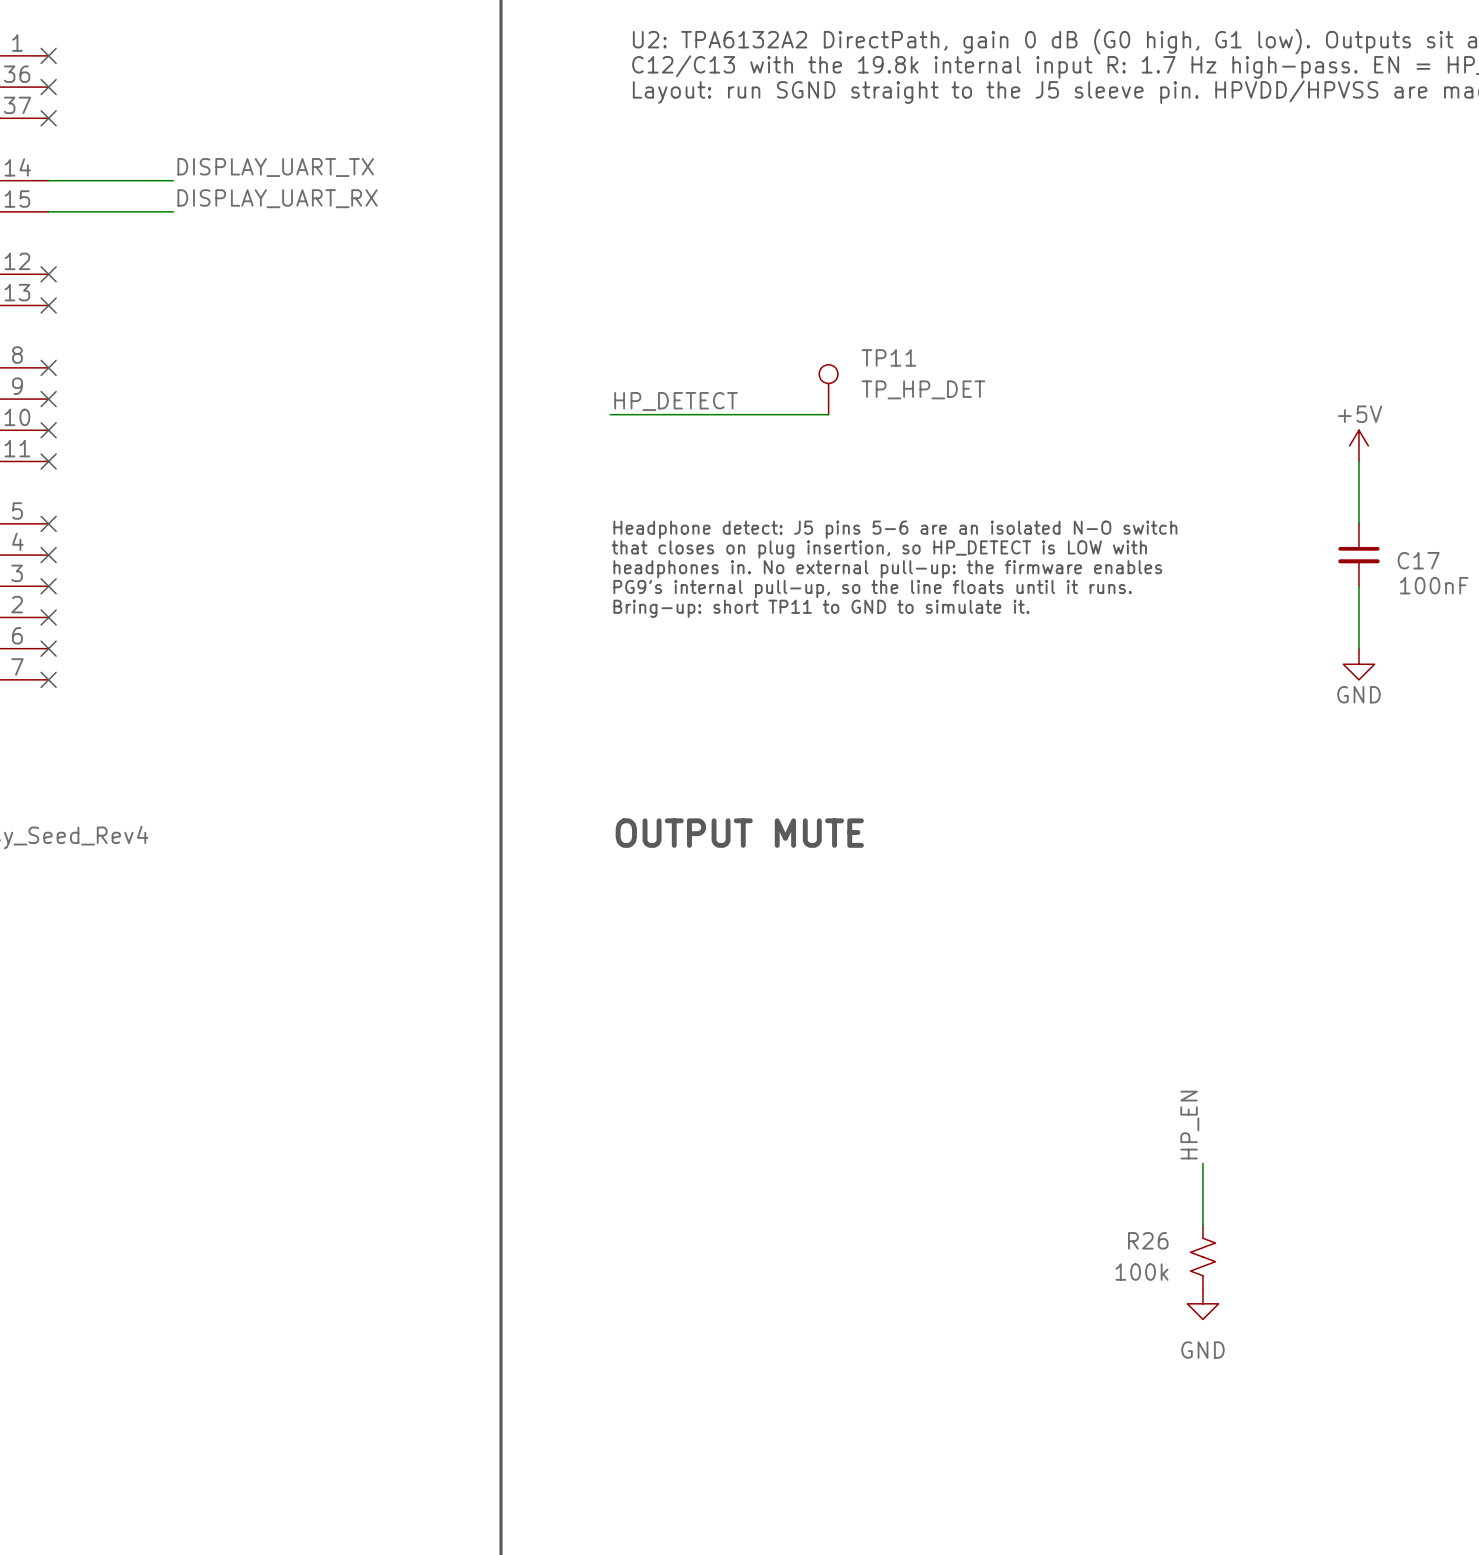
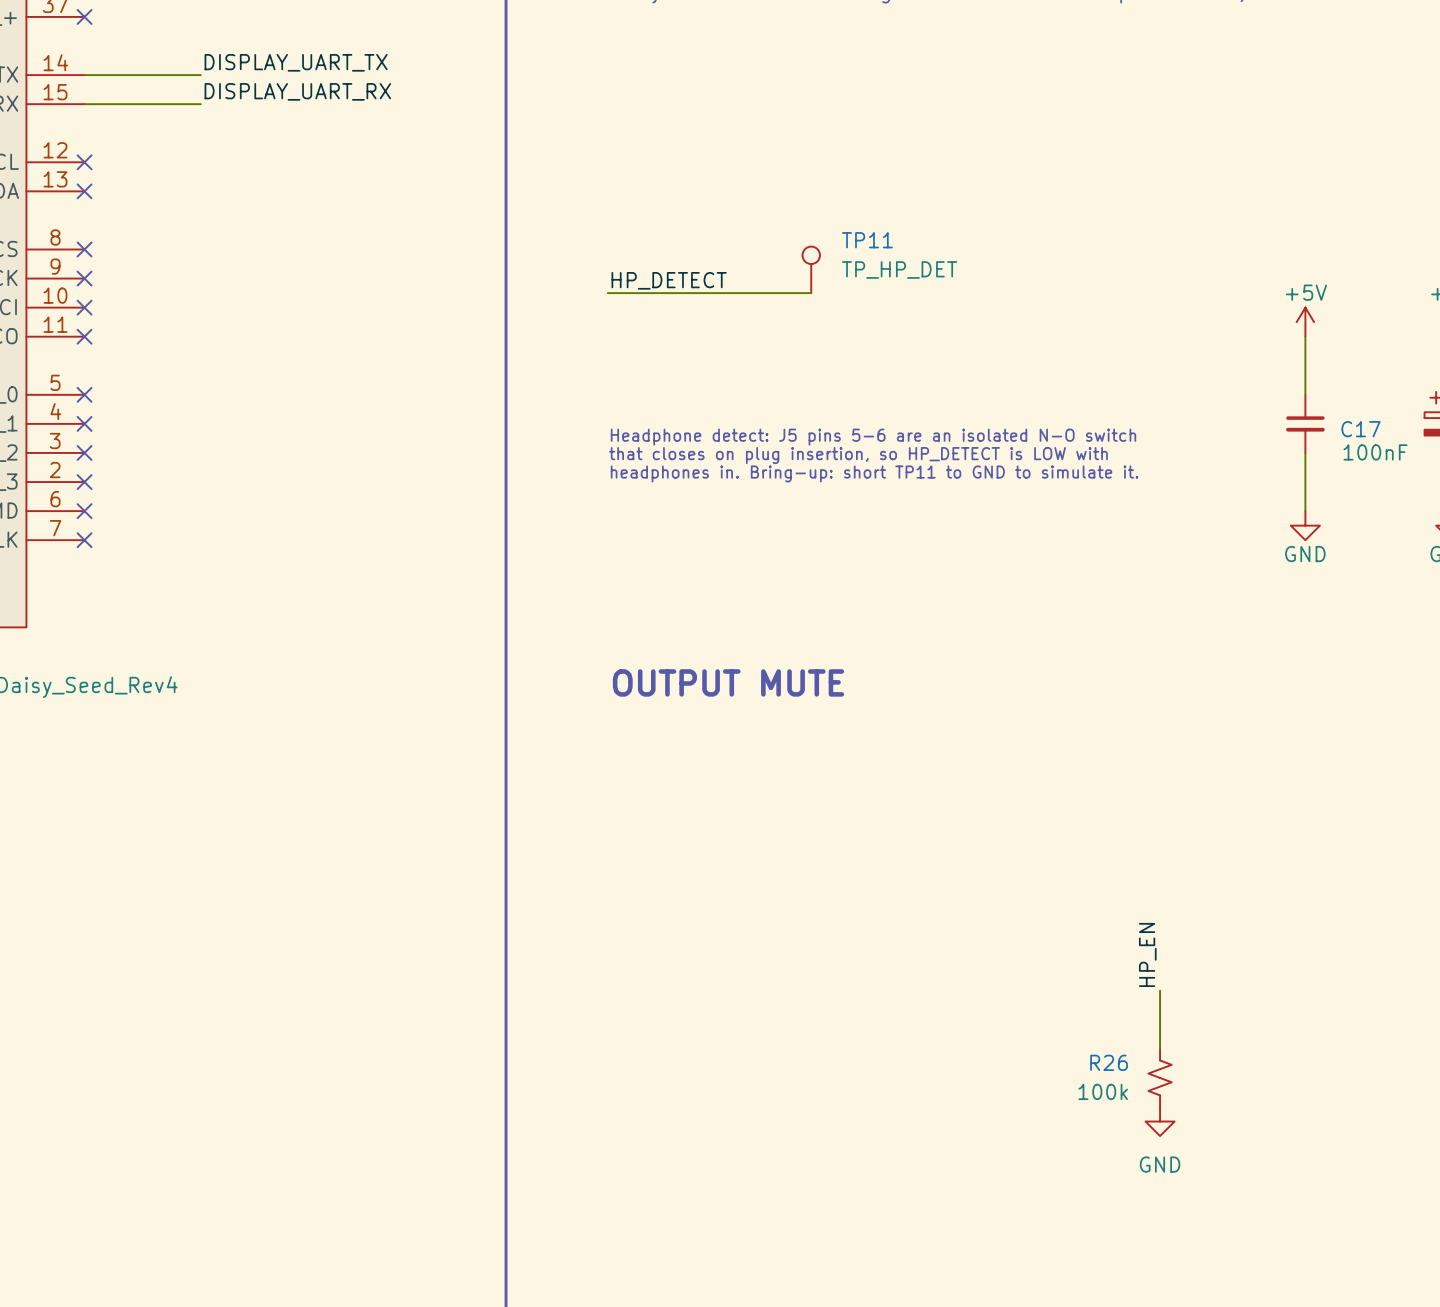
text: Headphone detect: J5 pins 5-6 are an isolated N-O switch (895, 529) -> none
text: that closes on plug insertion, so HP_DETECT is LOW with (879, 549) -> none
text: headphones in. No external pull-up: the firmware enables (887, 569) -> Headphone detect: J5 pins 5-6 are an isolated N-O switch (873, 437)
text: PG9's internal pull-up, so the line floats until it runs. (872, 589) -> that closes on plug insertion, so HP_DETECT is LOW with (858, 455)
text: Bring-up: short TP11 to GND to simulate it. (821, 608) -> headphones in. Bring-up: short TP11 to GND to simulate it. (874, 473)

